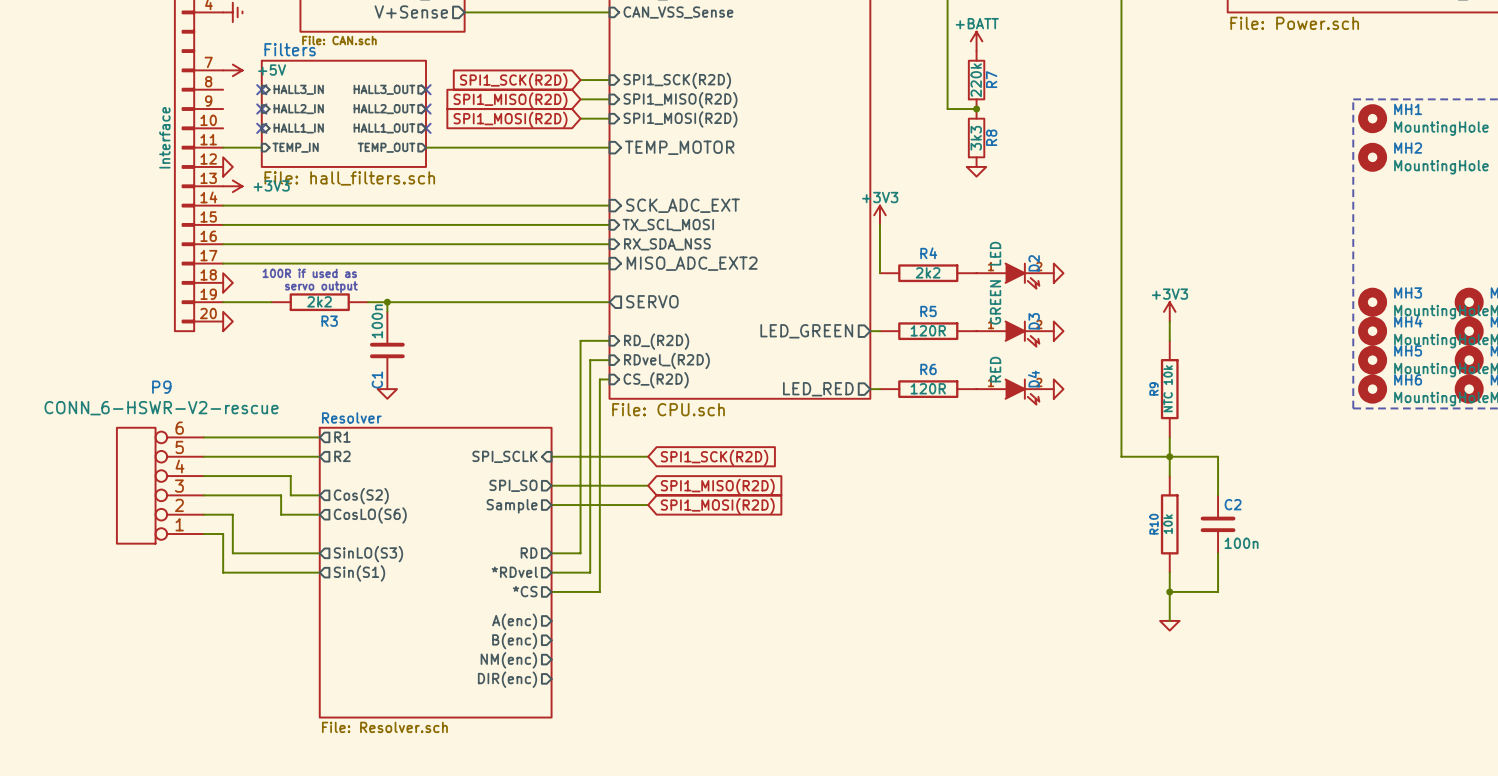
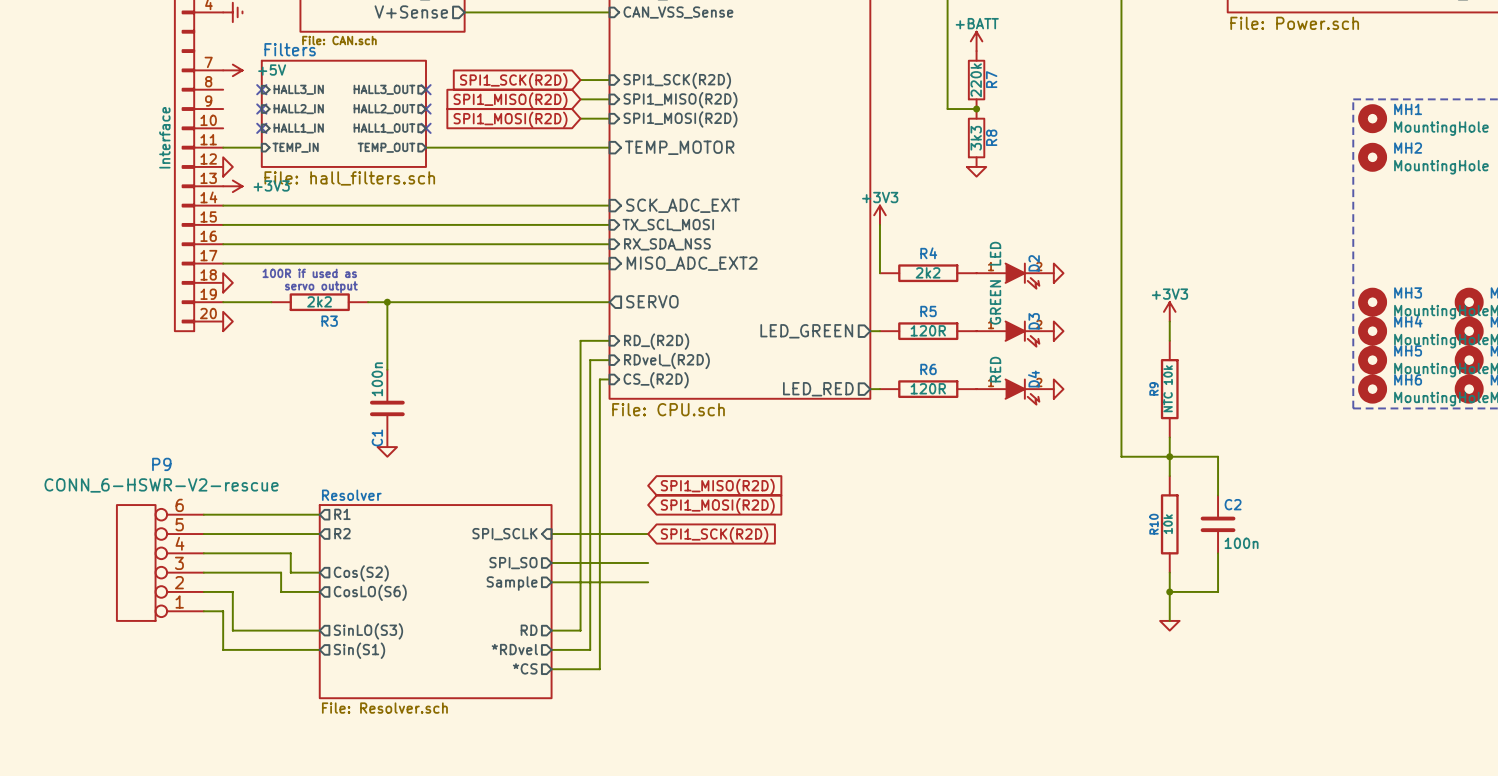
C1 position: (387, 350) -> (387, 408)
power symbol position: (387, 393) -> (387, 451)
wire: (203, 437) (319, 437) -> none
sheet pin: R1 (342, 437) -> none
wire: (203, 456) (319, 456) -> none
sheet pin position: R2 (342, 456) -> R2 (342, 533)
sheet pin position: SPI_SCLK (504, 456) -> SPI_SCLK (504, 534)
wire: (551, 456) (648, 456) -> (551, 534) (648, 534)
global label position: SPI1_SCK(R2D) (714, 457) -> SPI1_SCK(R2D) (714, 535)
wire: (203, 476) (290, 476) (290, 495) (319, 495) -> none
P9 position: (160, 485) -> (160, 562)
sheet pin position: SPI_SO (513, 485) -> SPI_SO (513, 563)
wire: (551, 485) (648, 485) -> (551, 562) (648, 562)
wire: (203, 495) (281, 495) (281, 514) -> (232, 514) (281, 514)
sheet pin: Cos(S2) (361, 496) -> none
wire: (551, 505) (648, 505) -> (551, 582) (648, 582)
sheet pin position: Sample (512, 506) -> Sample (512, 583)
wire: (232, 514) (232, 553) -> (203, 553) (232, 553)
sheet pin: CosLO(S6) (370, 515) -> R1 (342, 514)
wire: (223, 534) (223, 572) -> (203, 572) (223, 572)
wire: none -> (223, 534) (319, 534)
sheet pin position: RD (529, 552) -> RD (529, 630)
wire: (290, 553) (319, 553) -> none
wire: (551, 553) (580, 553) -> (551, 630) (580, 630) (580, 553)
sheet pin position: SinLO(S3) (368, 554) -> SinLO(S3) (368, 631)
wire: (281, 572) (290, 572) -> (290, 553) (290, 572)
wire: none -> (281, 572) (281, 591) (319, 591)
sheet Resolver: File: Resolver.sch (435, 572) -> none
sheet pin position: *RDvel (514, 572) -> *RDvel (514, 649)
wire: (551, 572) (590, 572) -> (551, 649) (590, 649) (590, 572)
sheet pin: Sin(S1) (359, 573) -> Cos(S2) (361, 573)
wire: none -> (203, 591) (232, 591) (232, 630) (319, 630)
sheet pin position: *CS (525, 591) -> *CS (525, 668)
wire: (551, 591) (599, 591) -> (551, 669) (599, 669) (599, 591)
sheet pin: none -> CosLO(S6) (370, 592)
sheet Resolver: none -> File: Resolver.sch (435, 601)
wire: none -> (203, 611) (223, 611) (223, 649) (319, 649)
sheet pin: A(enc) (514, 621) -> none
sheet pin: B(enc) (514, 641) -> none
sheet pin: none -> Sin(S1) (359, 650)
sheet pin: NM(enc) (508, 660) -> none
sheet pin: DIR(enc) (507, 679) -> none

